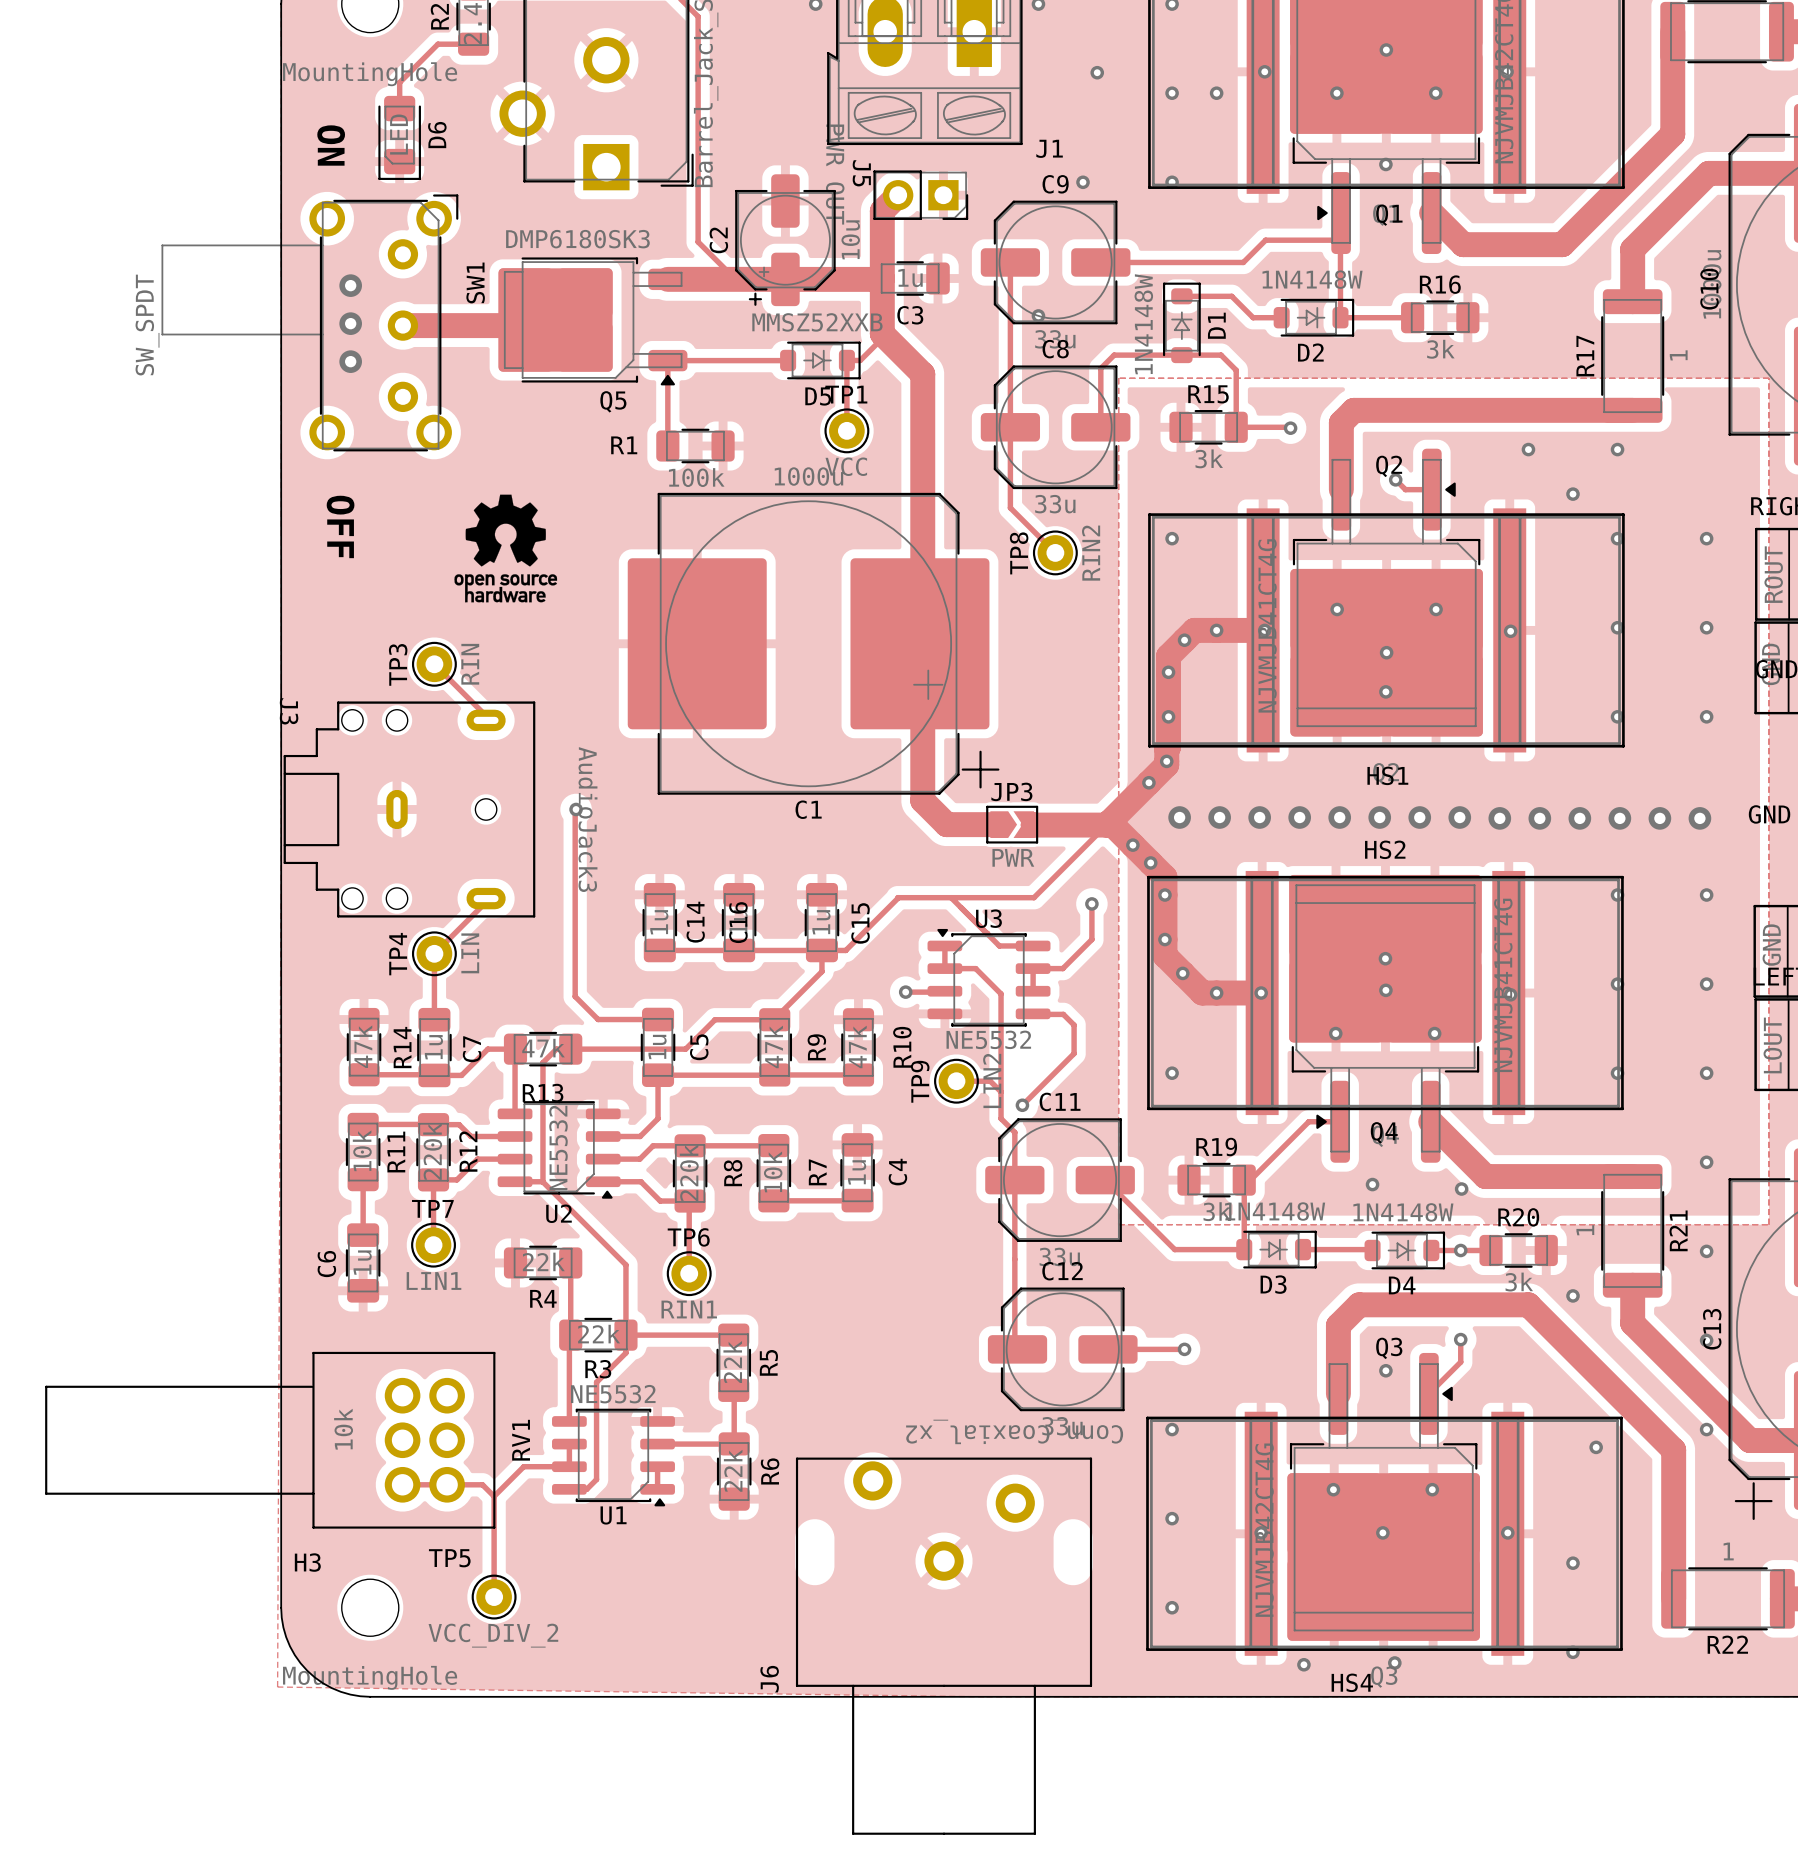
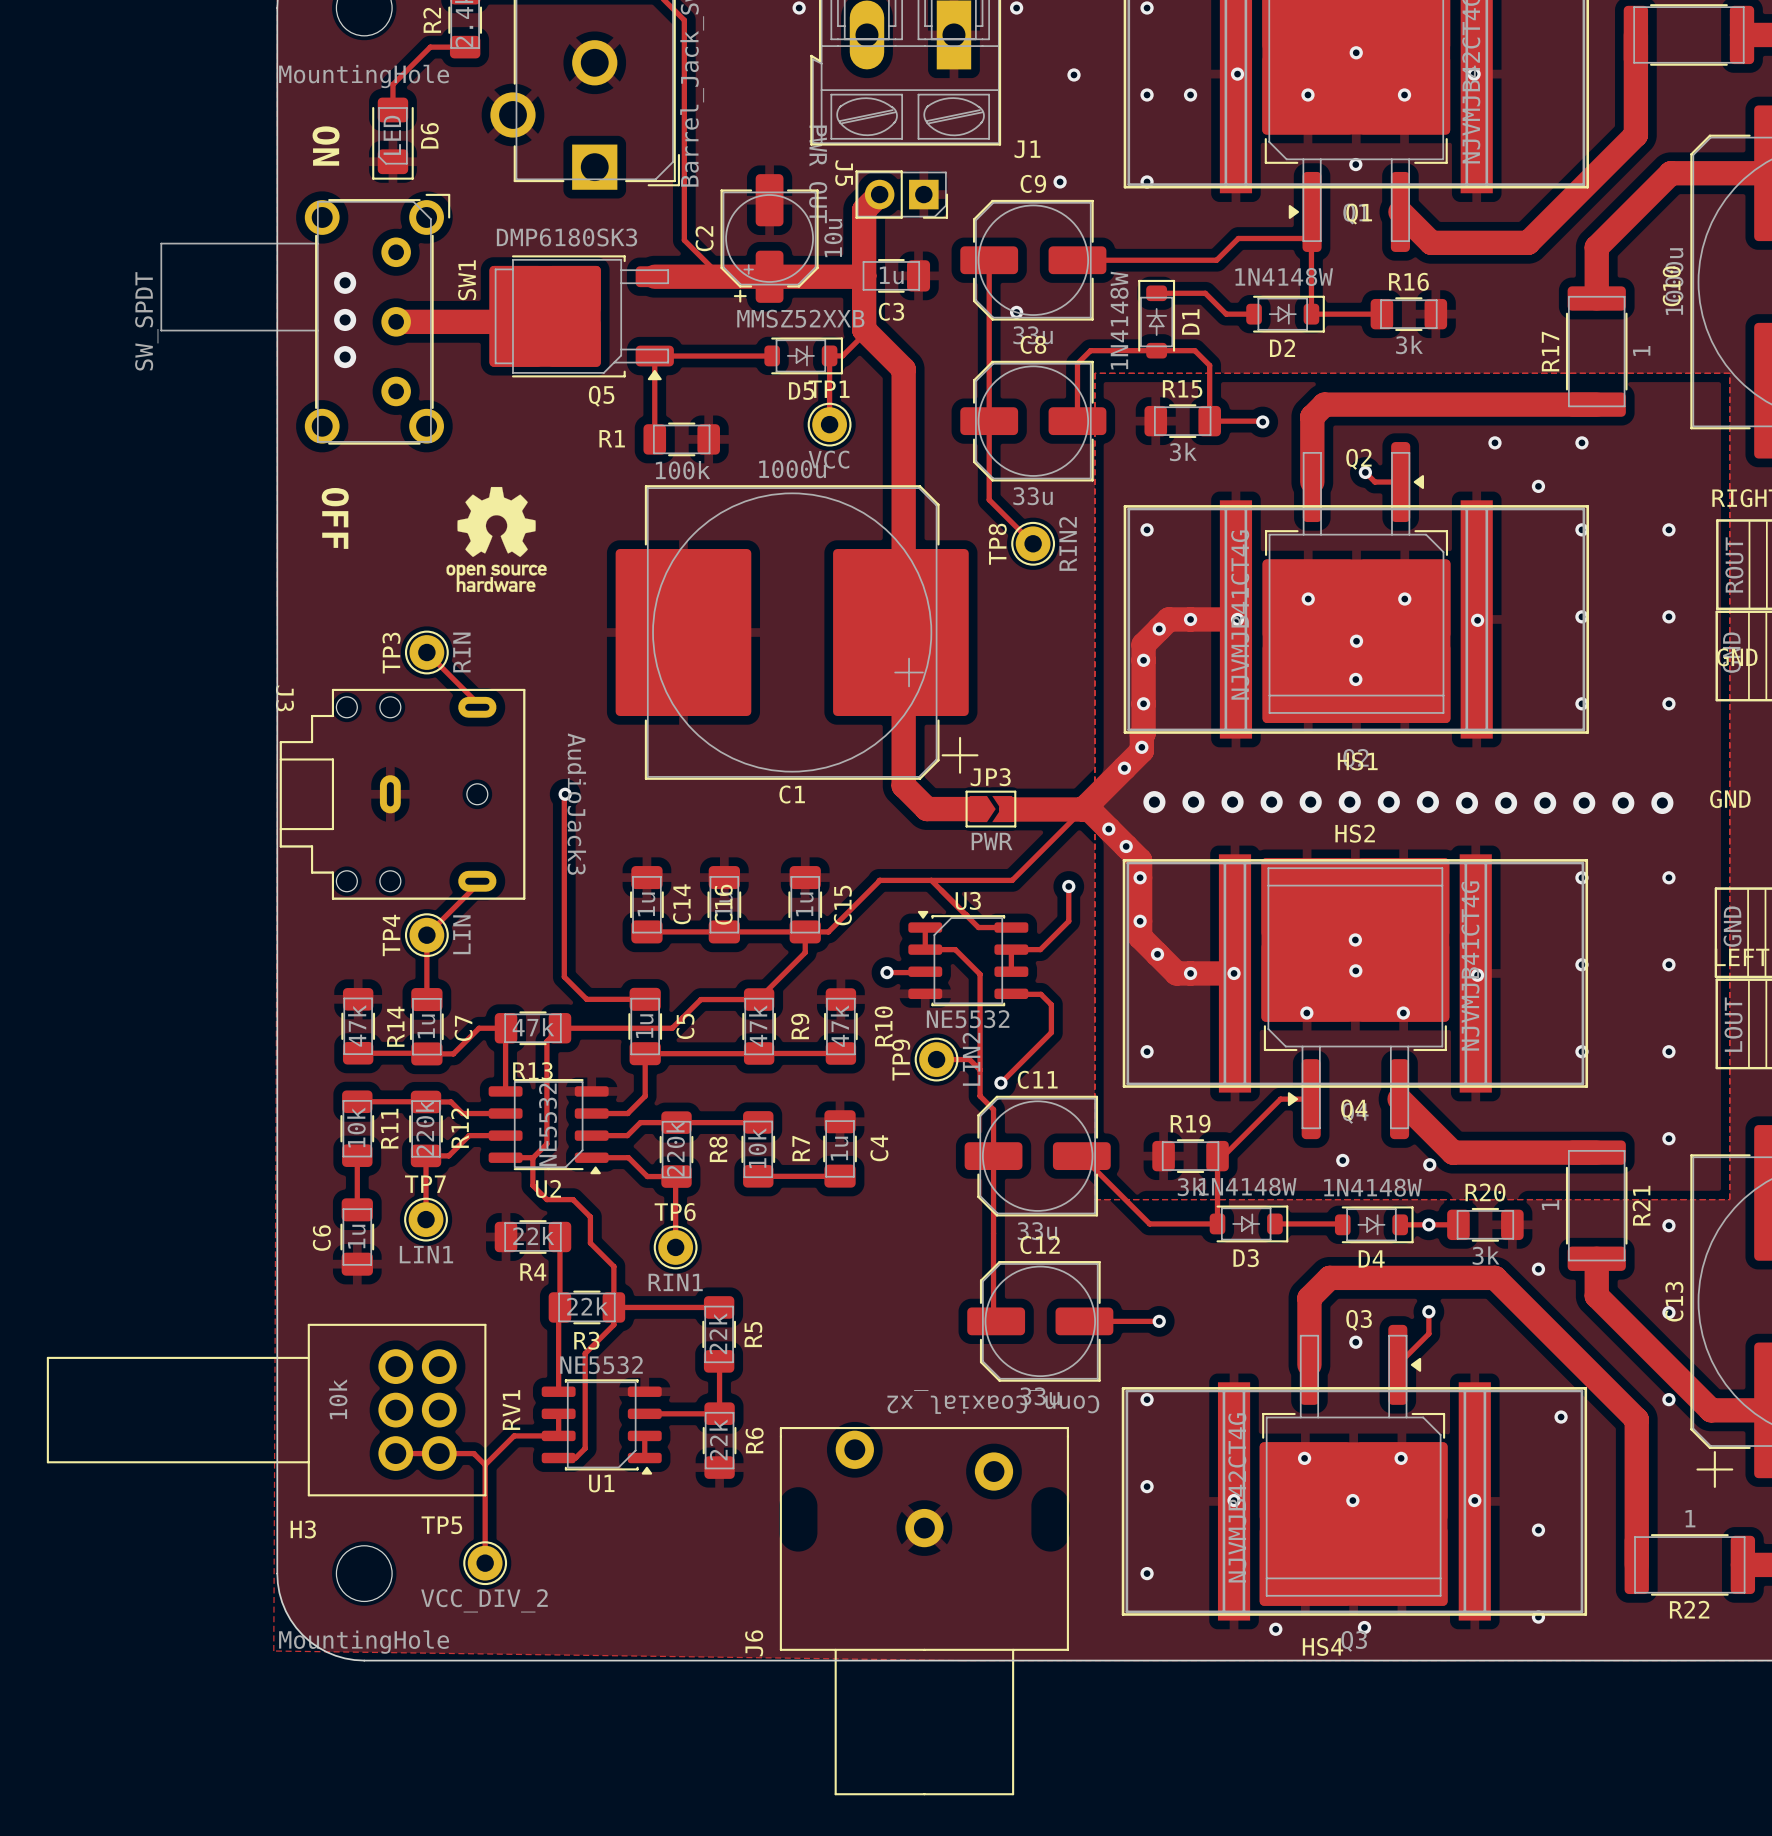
track: (570, 1049) (556, 1049) (542, 1062) (542, 1182) (625, 1265) (625, 1293) -> (559, 1028) (546, 1041) (546, 1143) (532, 1157) (532, 1185) (546, 1199) (573, 1199) (590, 1216) (590, 1243) (613, 1266)

